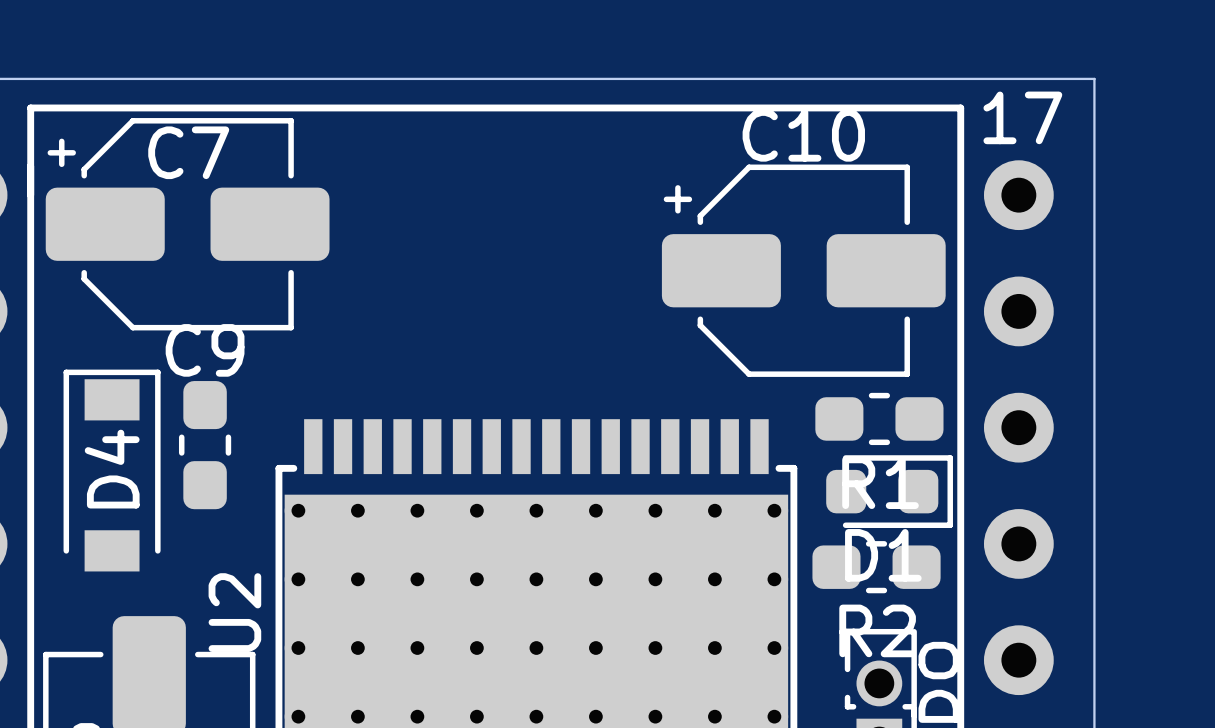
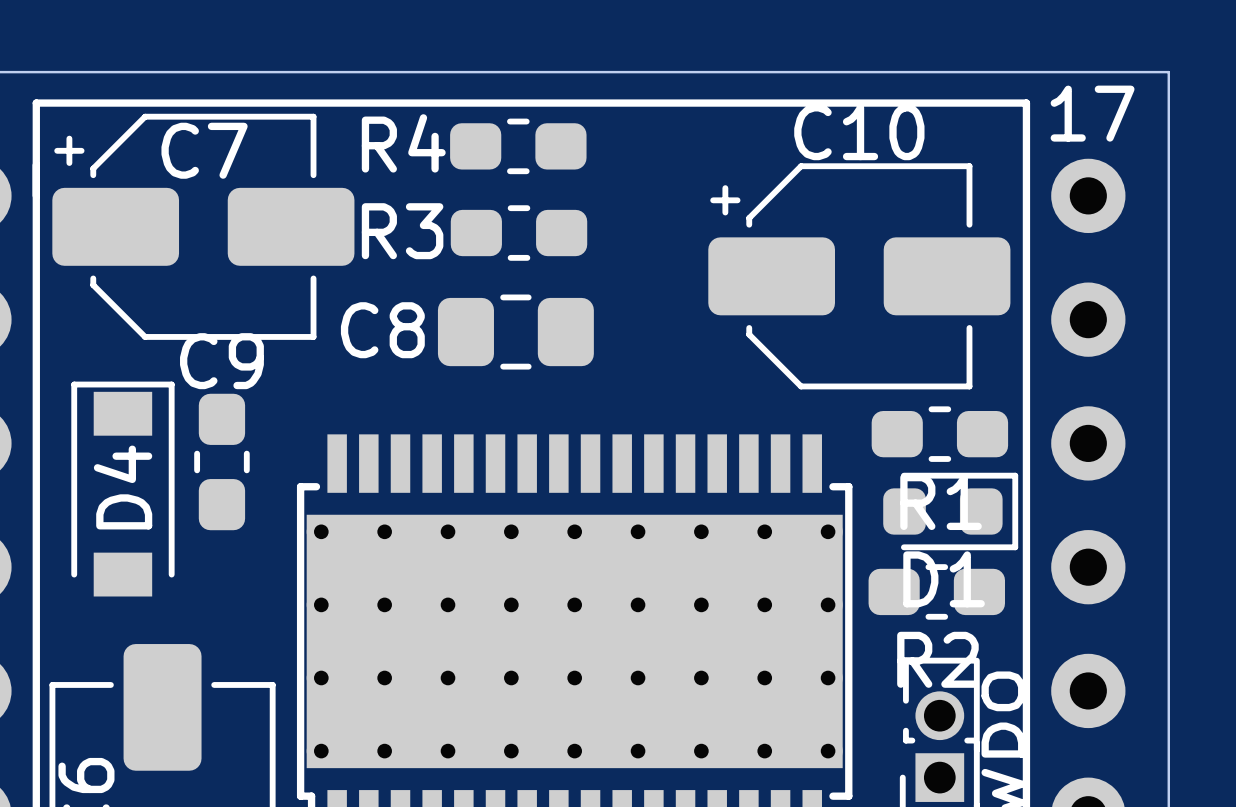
R4: none -> (518, 146)
R3: none -> (519, 233)
C8: none -> (515, 332)
U2 name: U2 (234, 612) -> none

